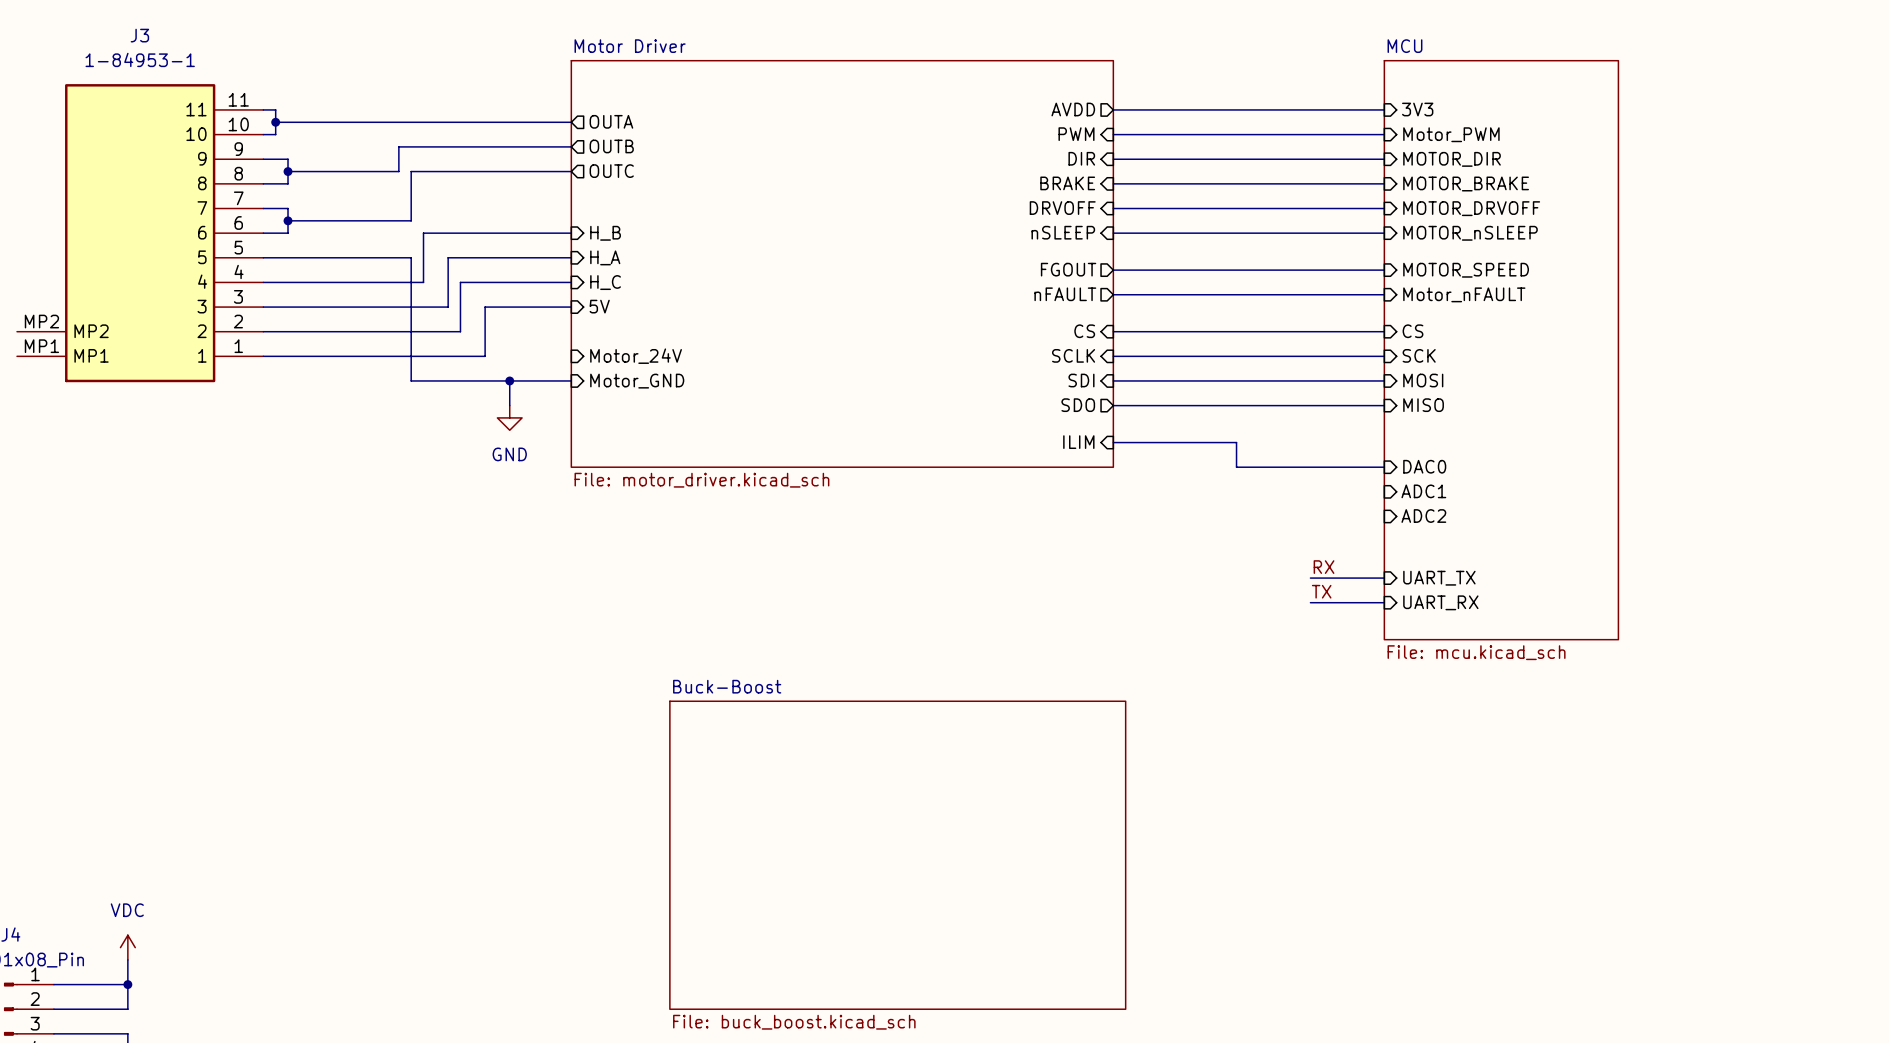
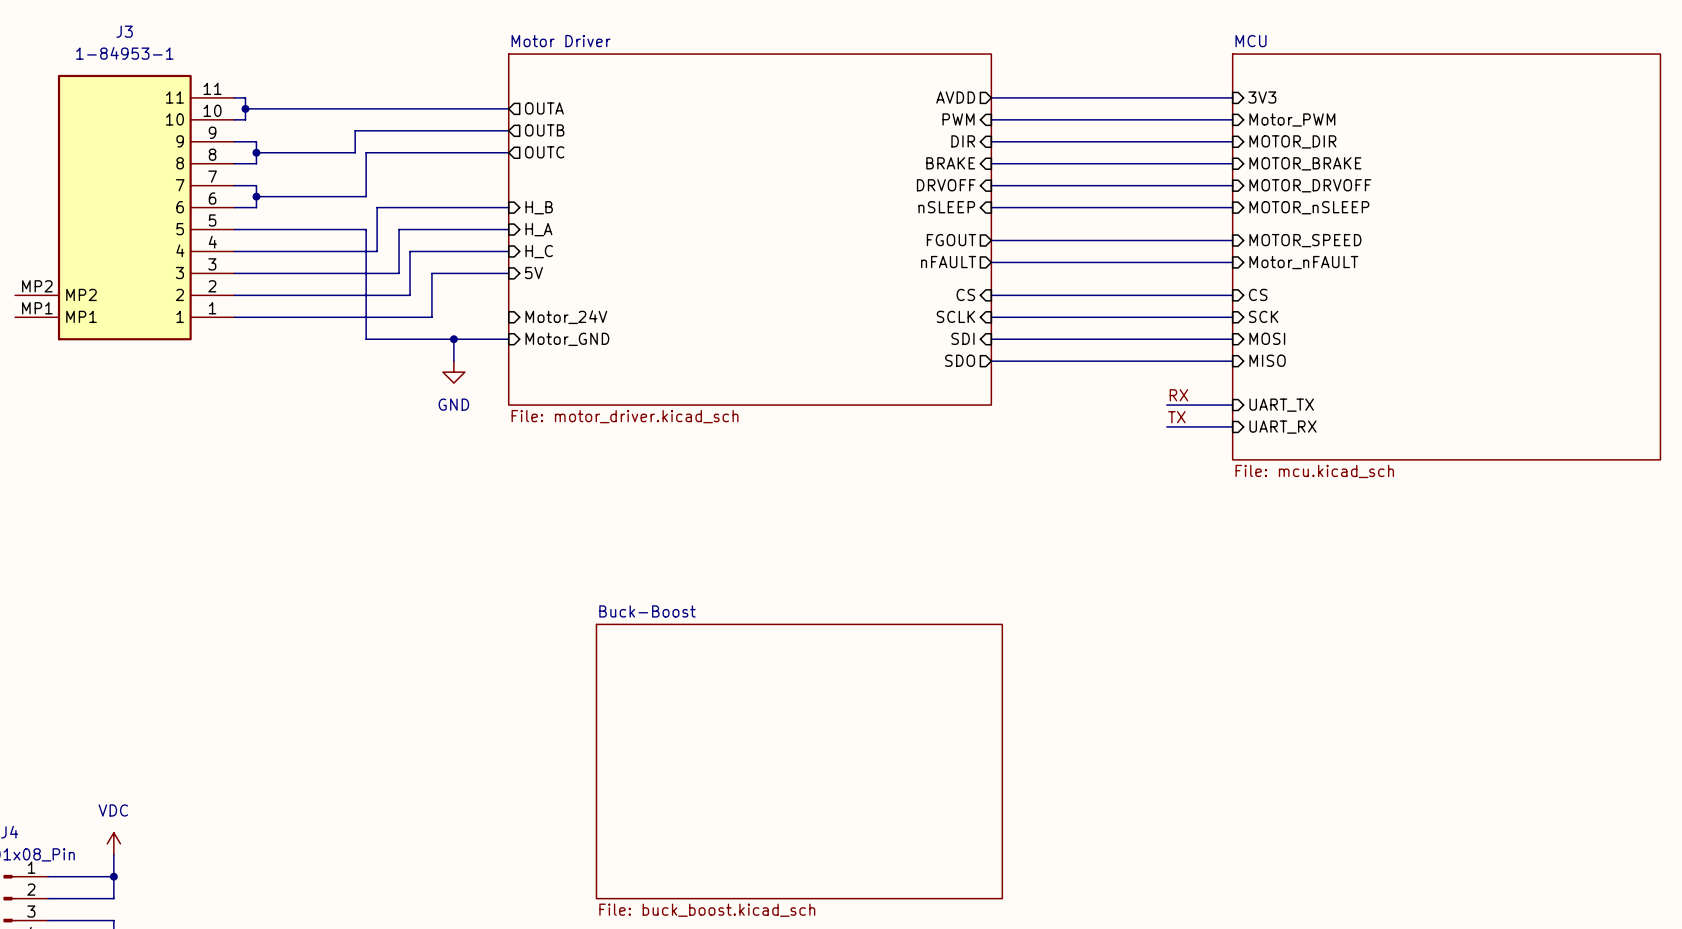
sheet Motor Driver shape: [570, 59, 1115, 468] -> [508, 53, 993, 406]
sheet MCU: none -> File: mcu.kicad_sch (1446, 256)
sheet MCU: File: mcu.kicad_sch (1501, 350) -> none
sheet pin: ILIM (1078, 442) -> none
wire: (1113, 442) (1236, 442) (1236, 467) (1384, 467) -> none
sheet pin: DAC0 (1424, 466) -> none
sheet pin: ADC1 (1423, 491) -> none
sheet pin: ADC2 (1423, 516) -> none
label position: RX (1324, 567) -> RX (1178, 395)
wire: (1310, 578) (1384, 578) -> (1166, 405) (1232, 405)
sheet pin position: UART_TX (1439, 578) -> UART_TX (1281, 405)
label position: TX (1321, 591) -> TX (1176, 417)
wire: (1310, 602) (1384, 602) -> (1166, 426) (1232, 426)
sheet pin position: UART_RX (1440, 602) -> UART_RX (1282, 427)

